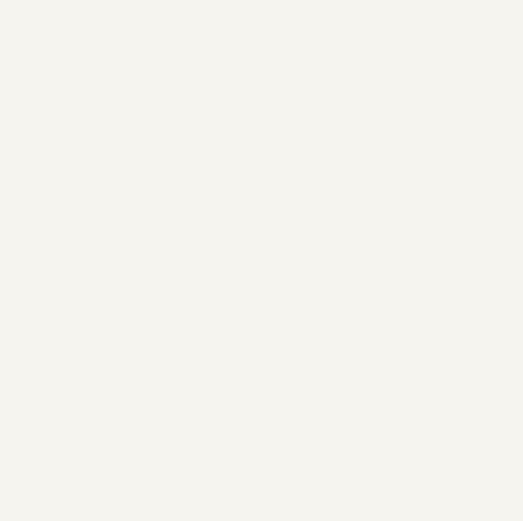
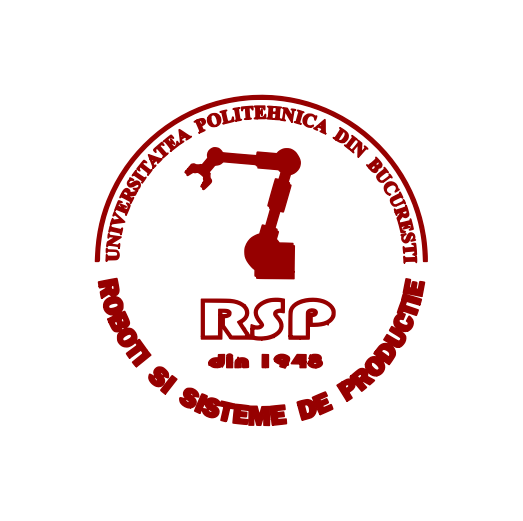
power symbol: none -> (261, 260)

